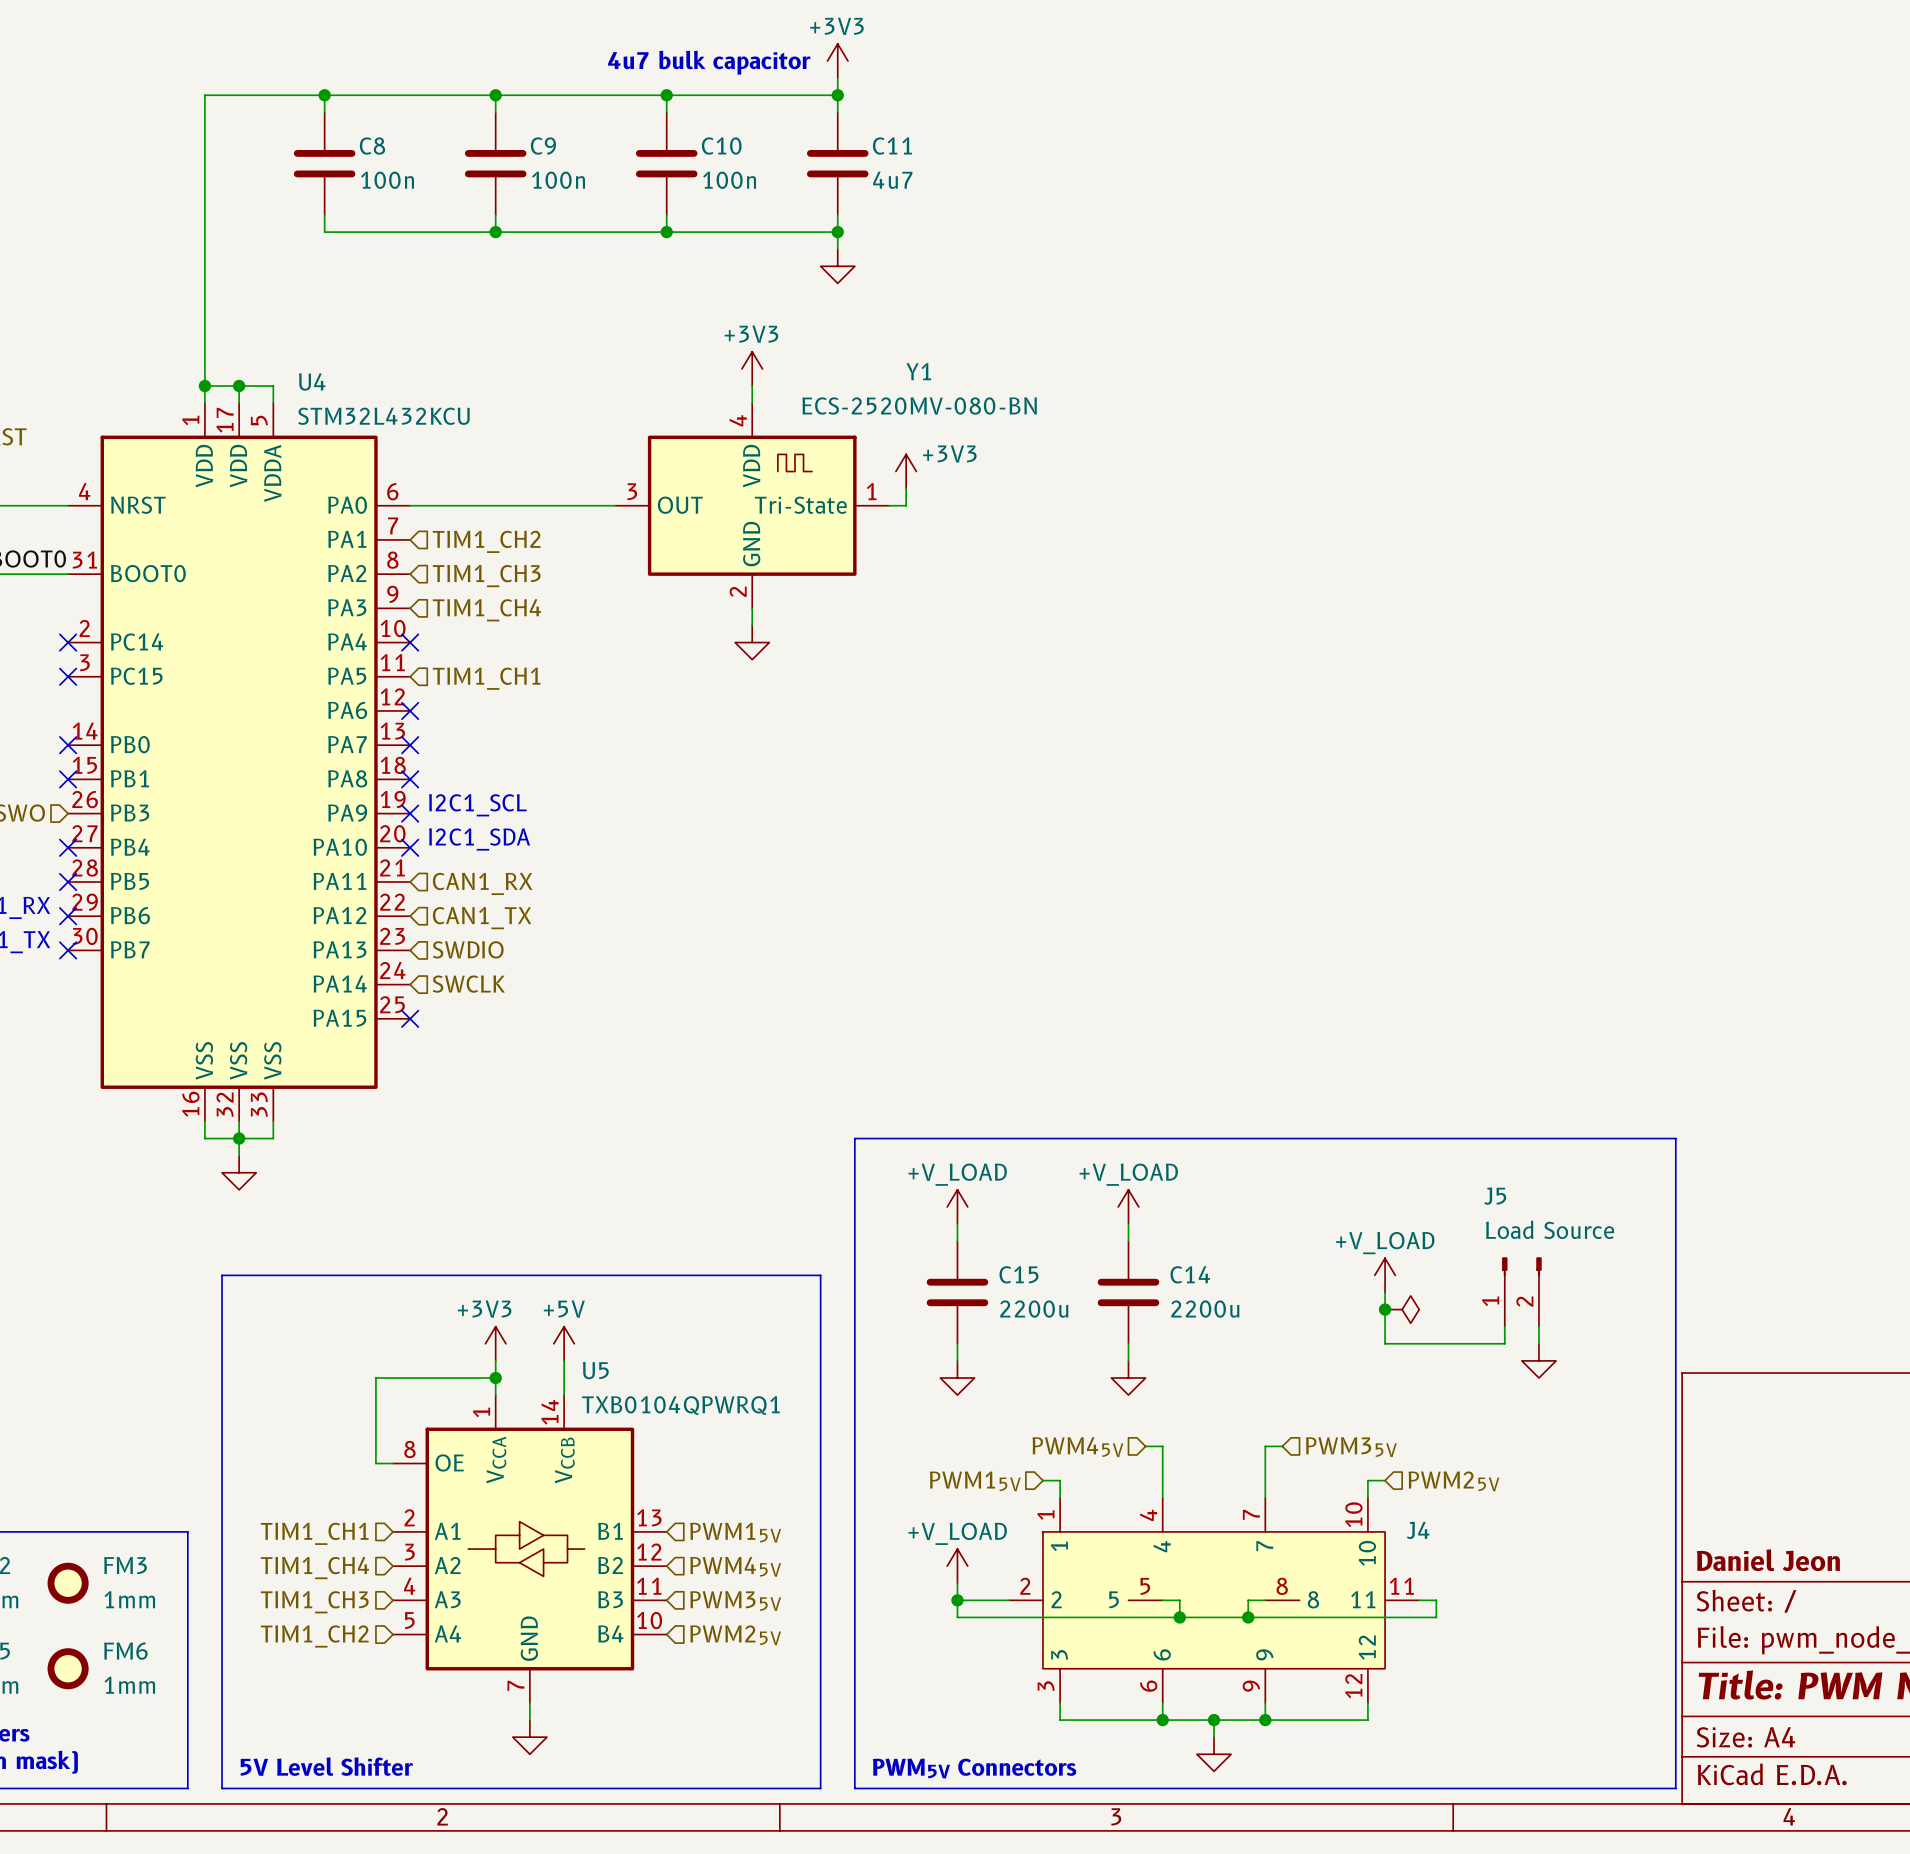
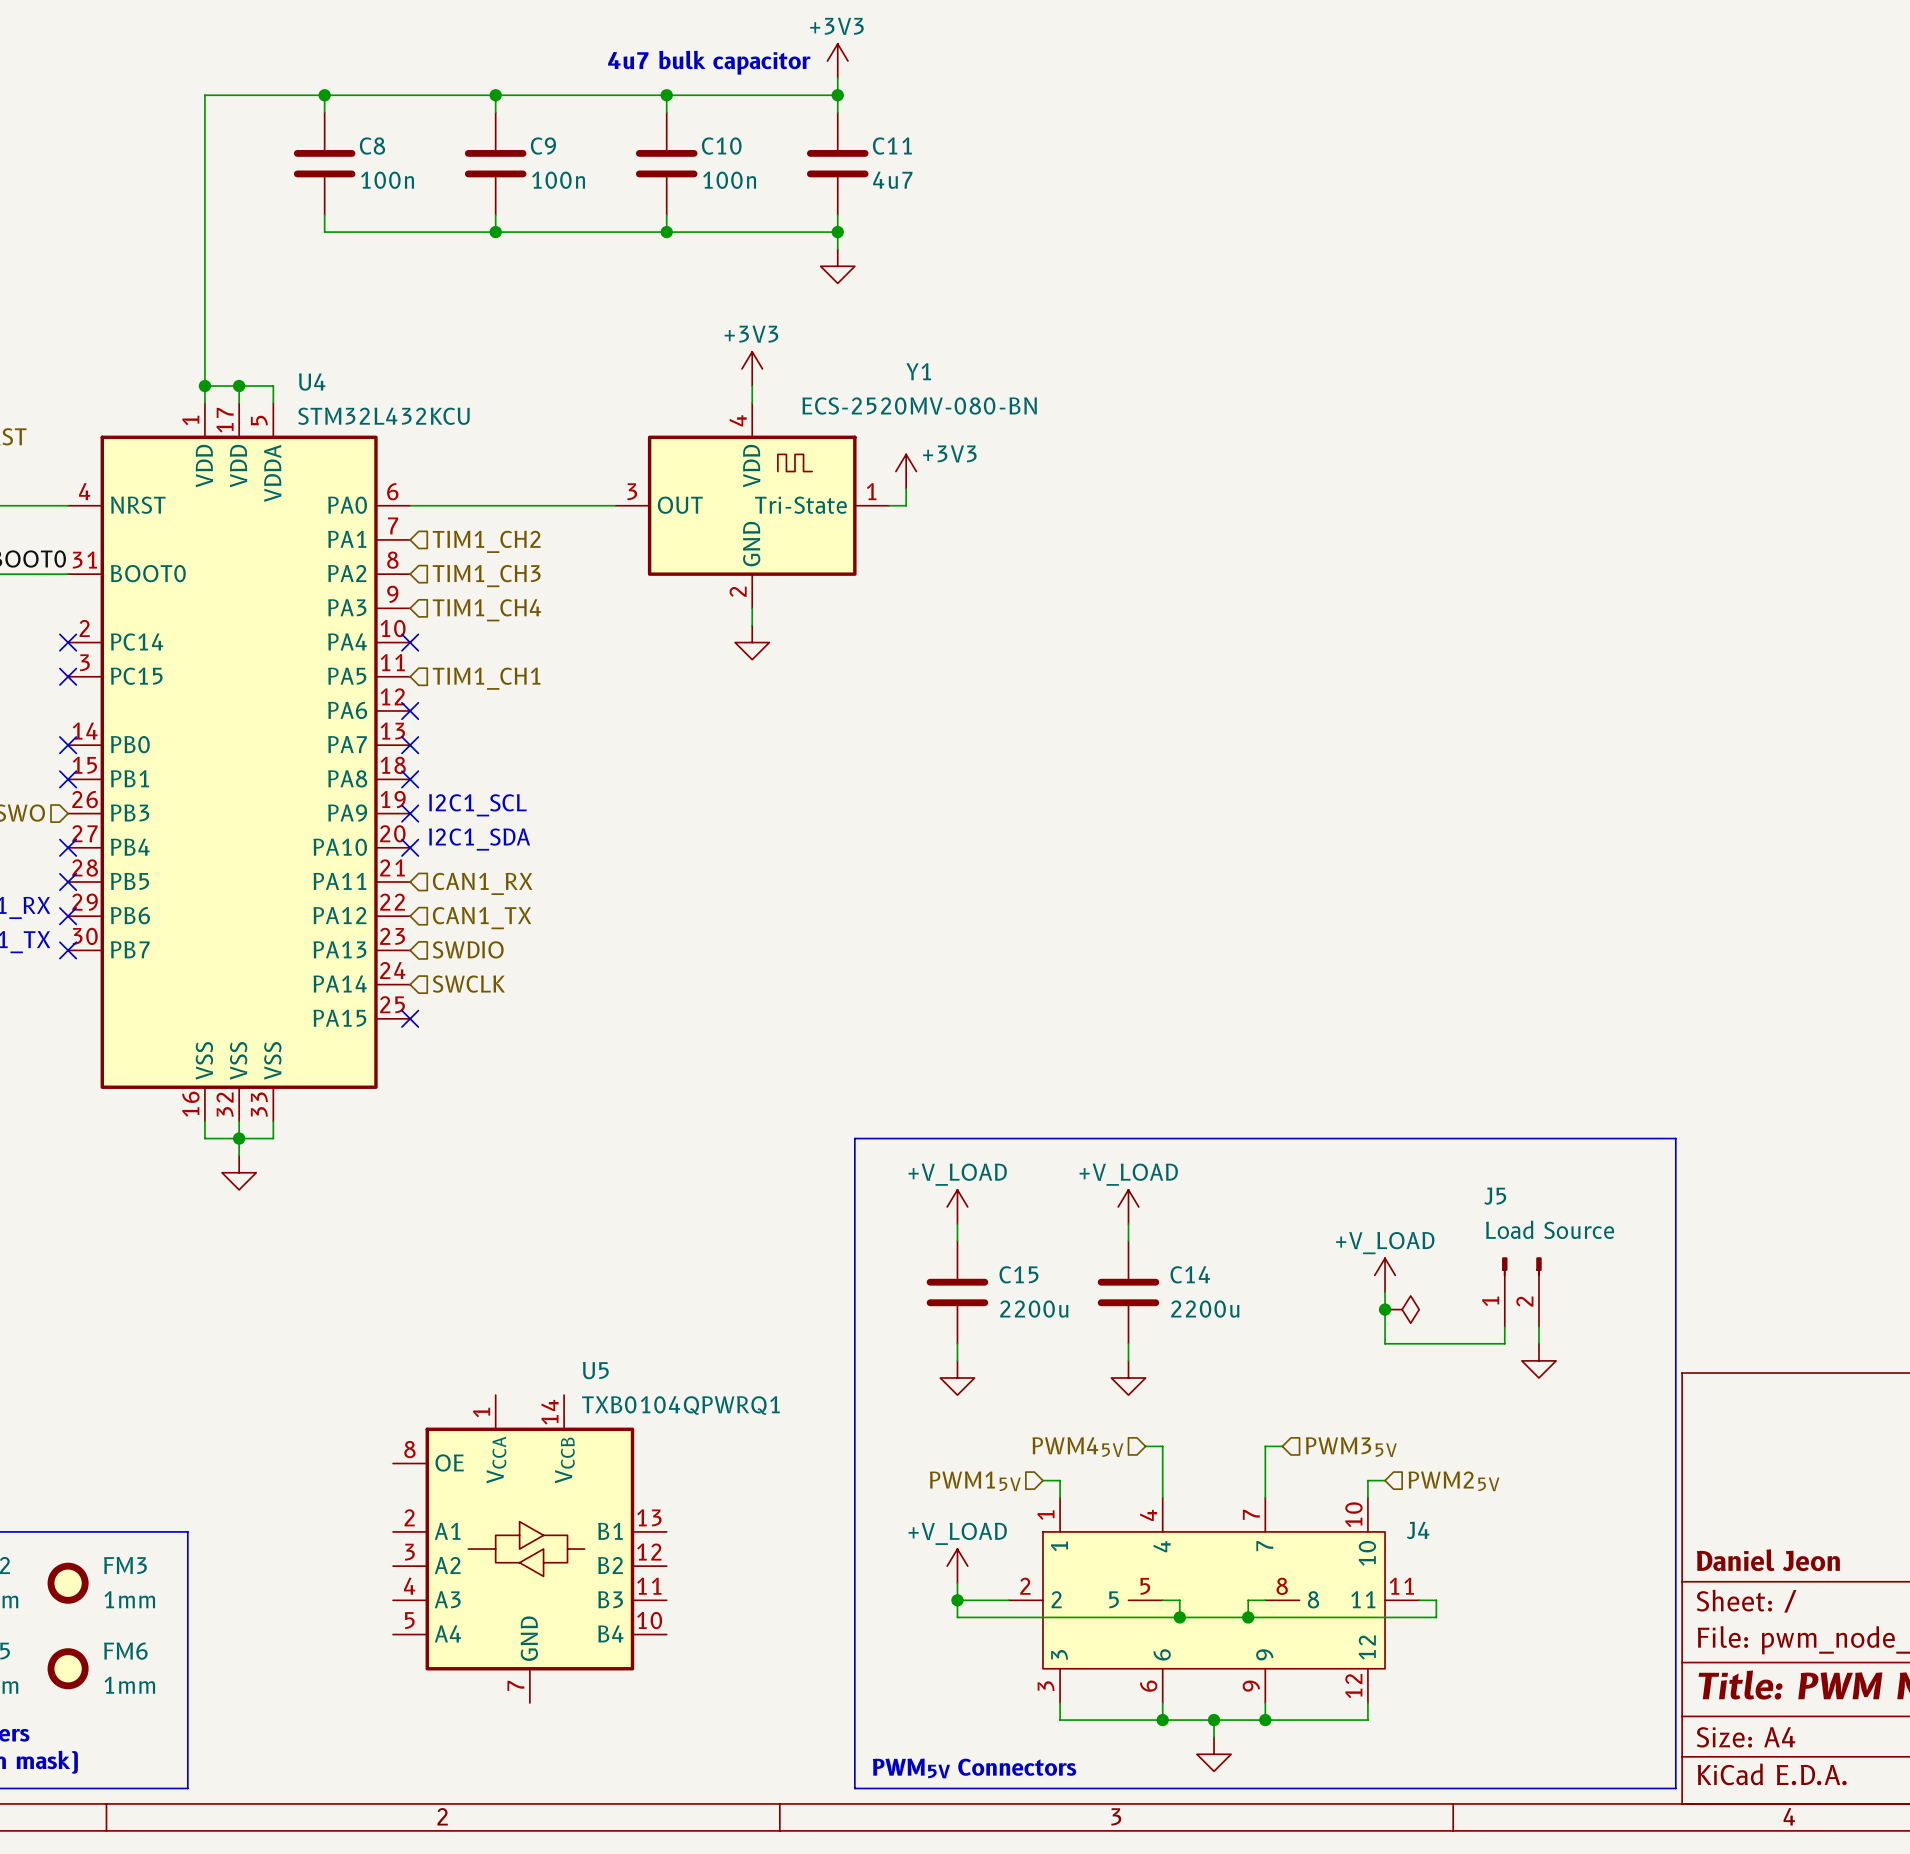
line: (222, 1275) (820, 1275) (820, 1788) (222, 1788) (222, 1275) -> none
power symbol: +3V3 (495, 1343) -> none
power symbol: +5V (564, 1343) -> none
wire: (495, 1360) (495, 1395) -> none
wire: (564, 1360) (564, 1395) -> none
wire: (495, 1378) (375, 1378) (375, 1463) (393, 1463) -> none
junction: (495, 1378) -> none
hierarchical label: PWM15V (735, 1532) -> none
hierarchical label: TIM1_CH1 (314, 1533) -> none
hierarchical label: PWM45V (735, 1566) -> none
hierarchical label: TIM1_CH4 (314, 1568) -> none
hierarchical label: PWM35V (735, 1601) -> none
hierarchical label: TIM1_CH3 (314, 1602) -> none
hierarchical label: PWM25V (735, 1635) -> none
hierarchical label: TIM1_CH2 (314, 1636) -> none
wire: (529, 1702) (529, 1720) -> none
power symbol: (529, 1737) -> none
text: 5V Level Shifter (326, 1766) -> none

